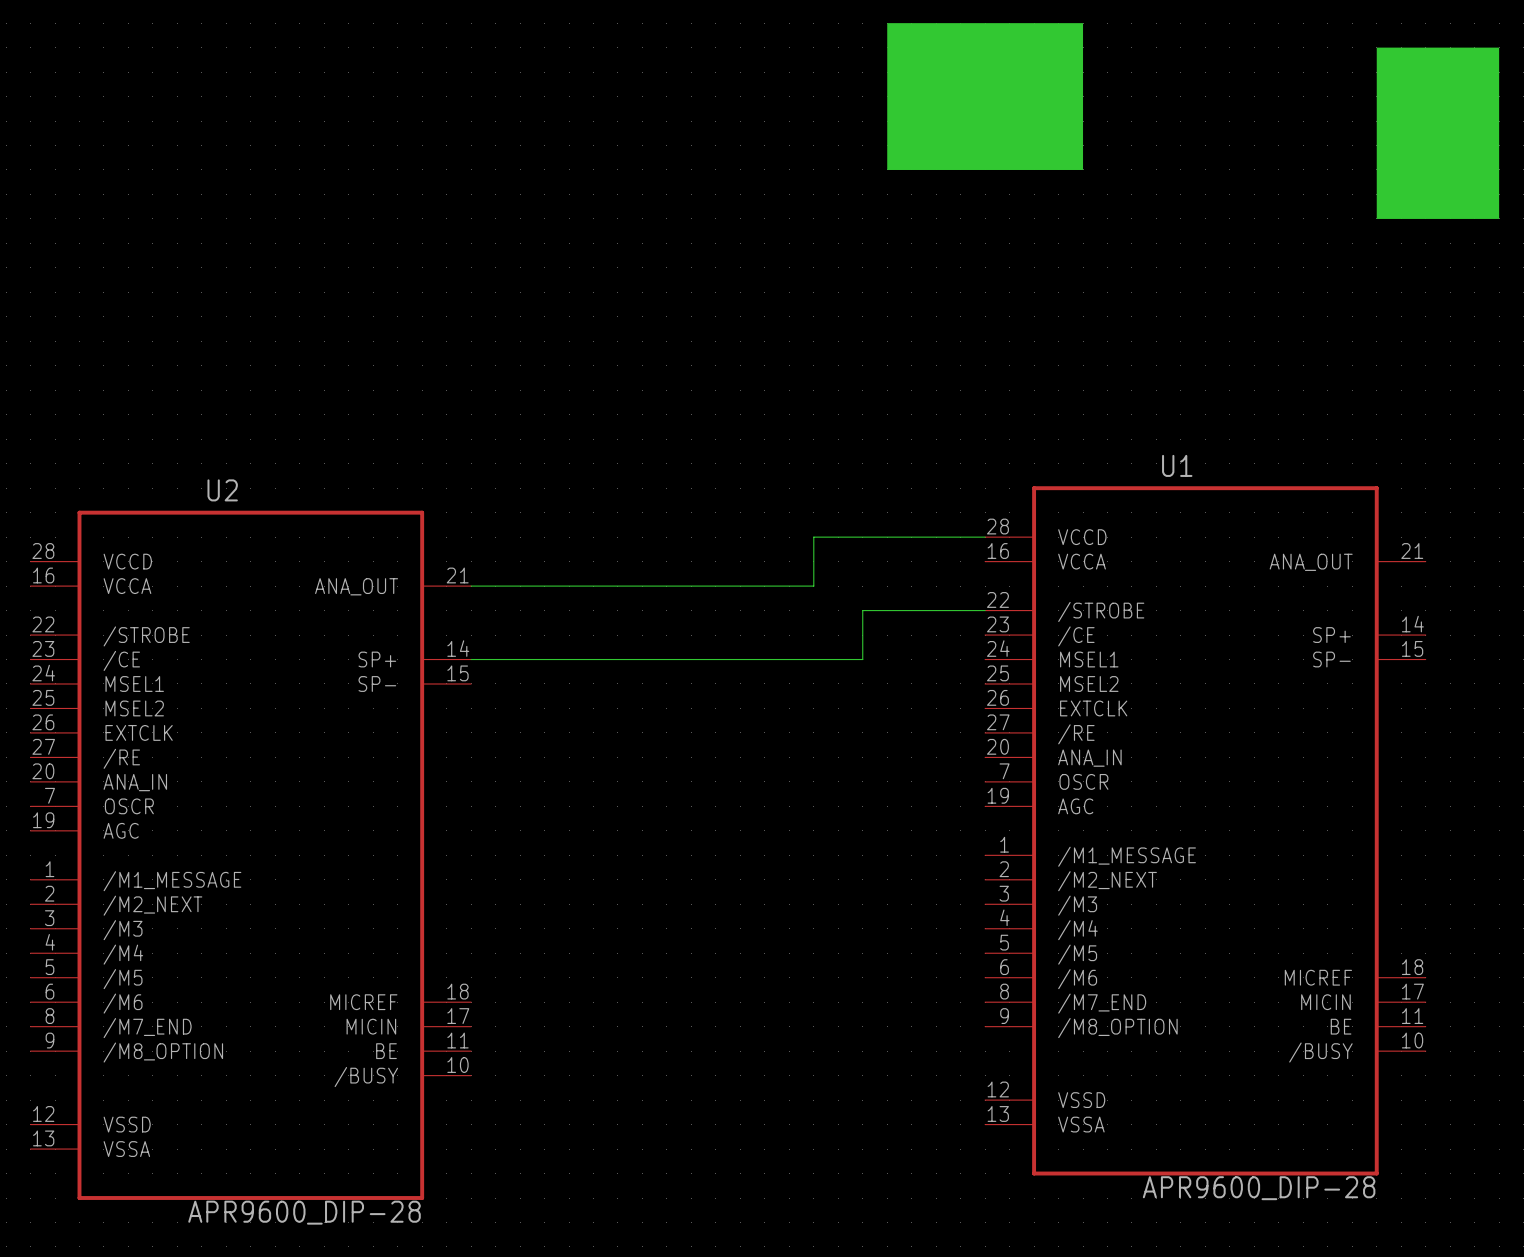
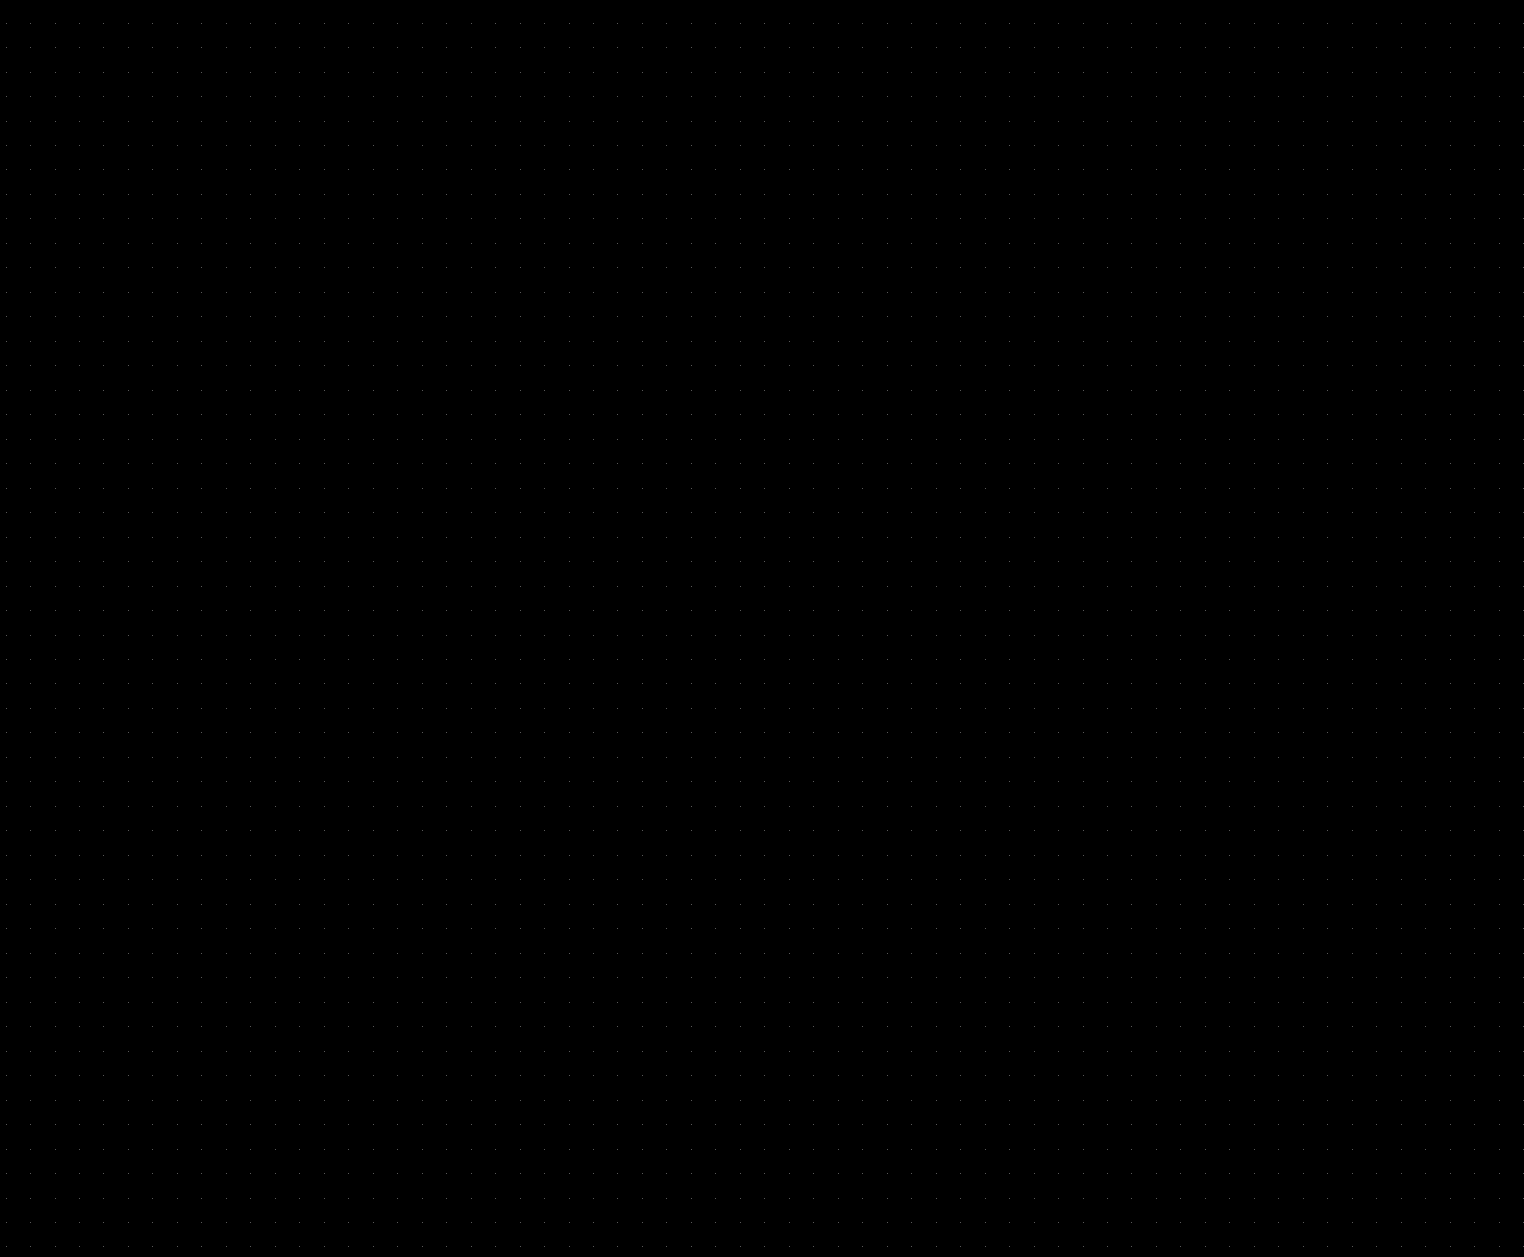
drawing: [887, 23, 1084, 170] -> none
drawing: [1376, 47, 1500, 219] -> none
wire: (985, 537) (813, 537) (813, 586) (471, 586) -> none
wire: (985, 610) (862, 610) (862, 659) (471, 659) -> none
U1: APR9600_DIP-28 (1205, 830) -> none
U2: APR9600_DIP-28 (250, 855) -> none

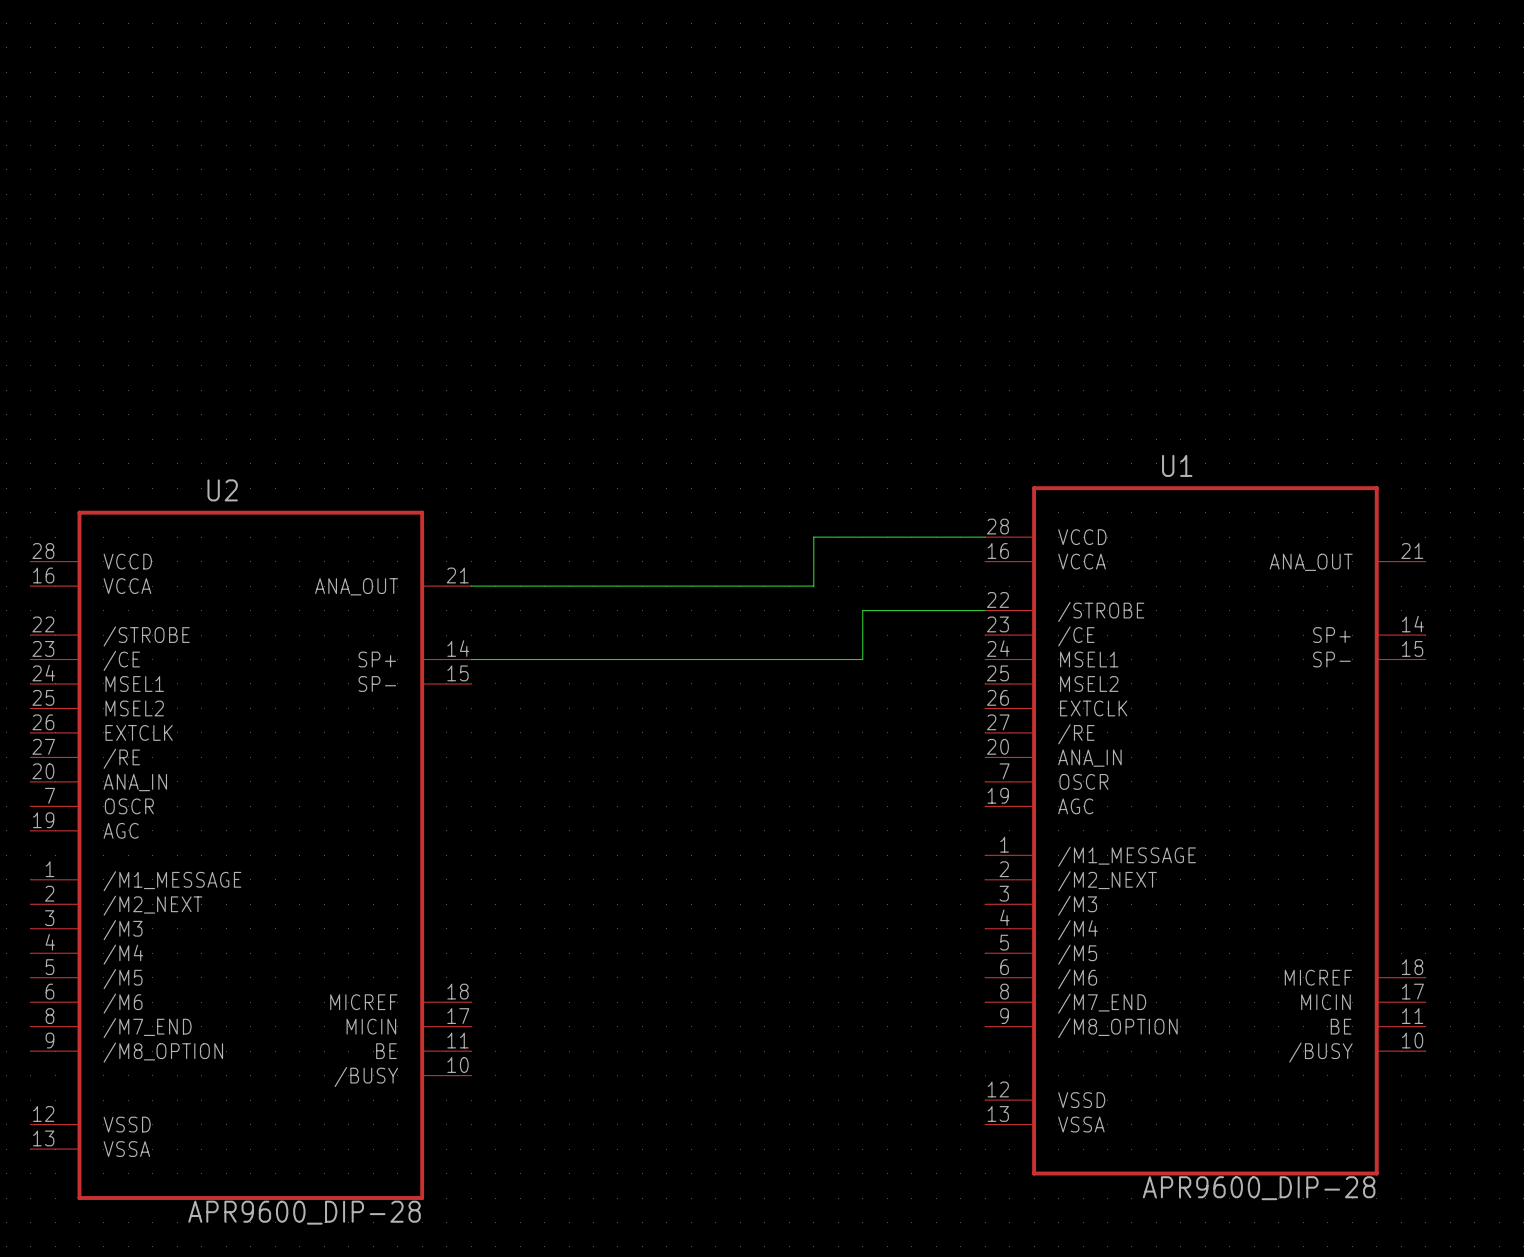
wire: none -> (985, 537) (813, 537) (813, 586) (471, 586)
wire: none -> (985, 610) (862, 610) (862, 659) (471, 659)
U1: none -> APR9600_DIP-28 (1205, 830)
U2: none -> APR9600_DIP-28 (250, 855)

